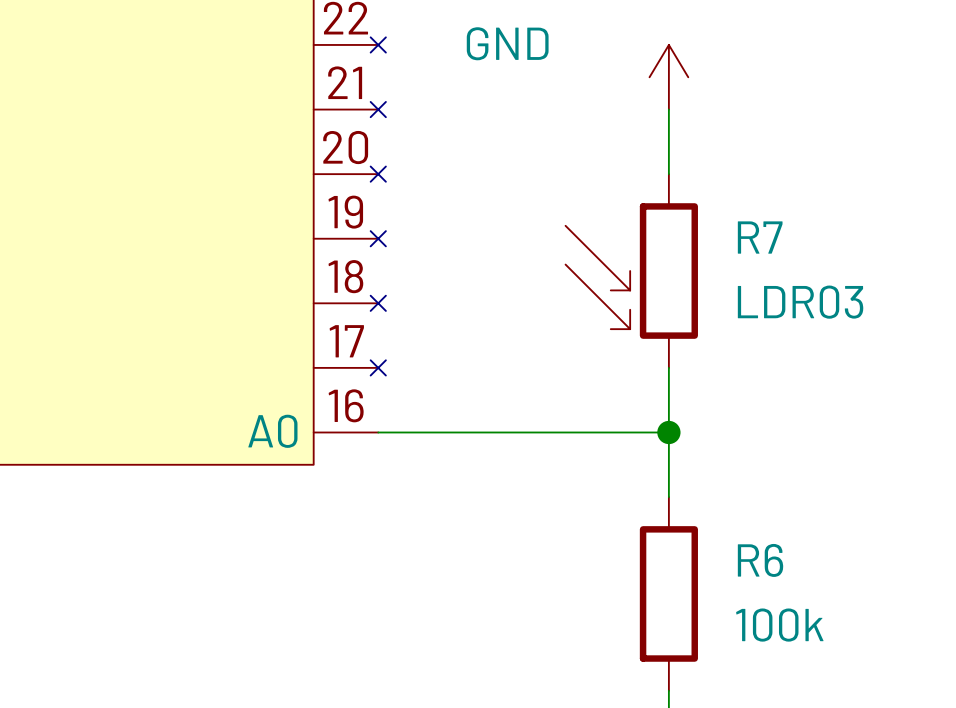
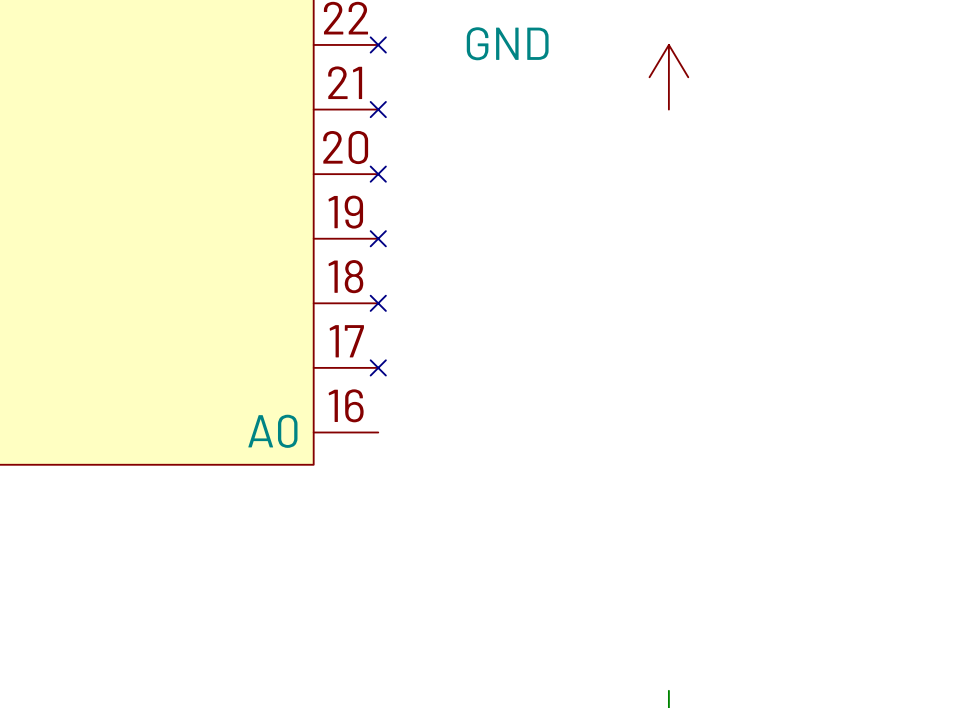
wire: (668, 109) (668, 174) -> none
R7: LDR03 (631, 271) -> none
wire: (668, 367) (668, 497) -> none
wire: (378, 432) (668, 432) -> none
junction: (668, 432) -> none
R6: 100k (668, 593) -> none

